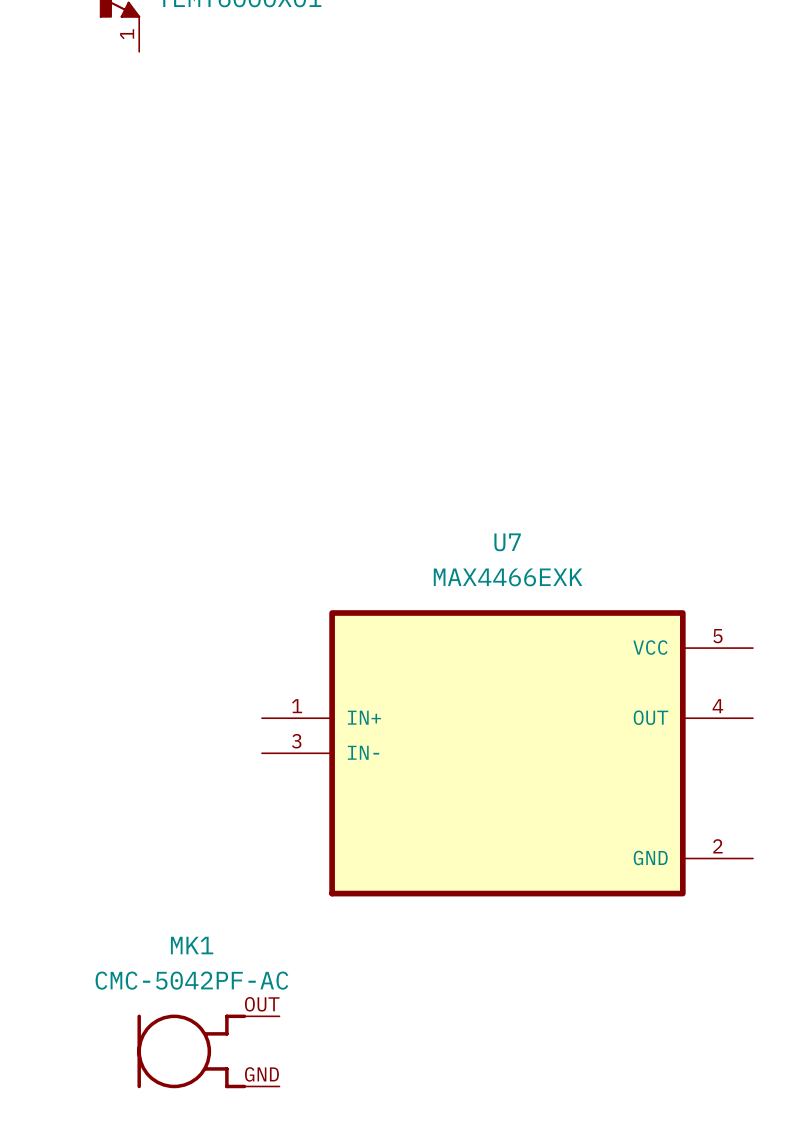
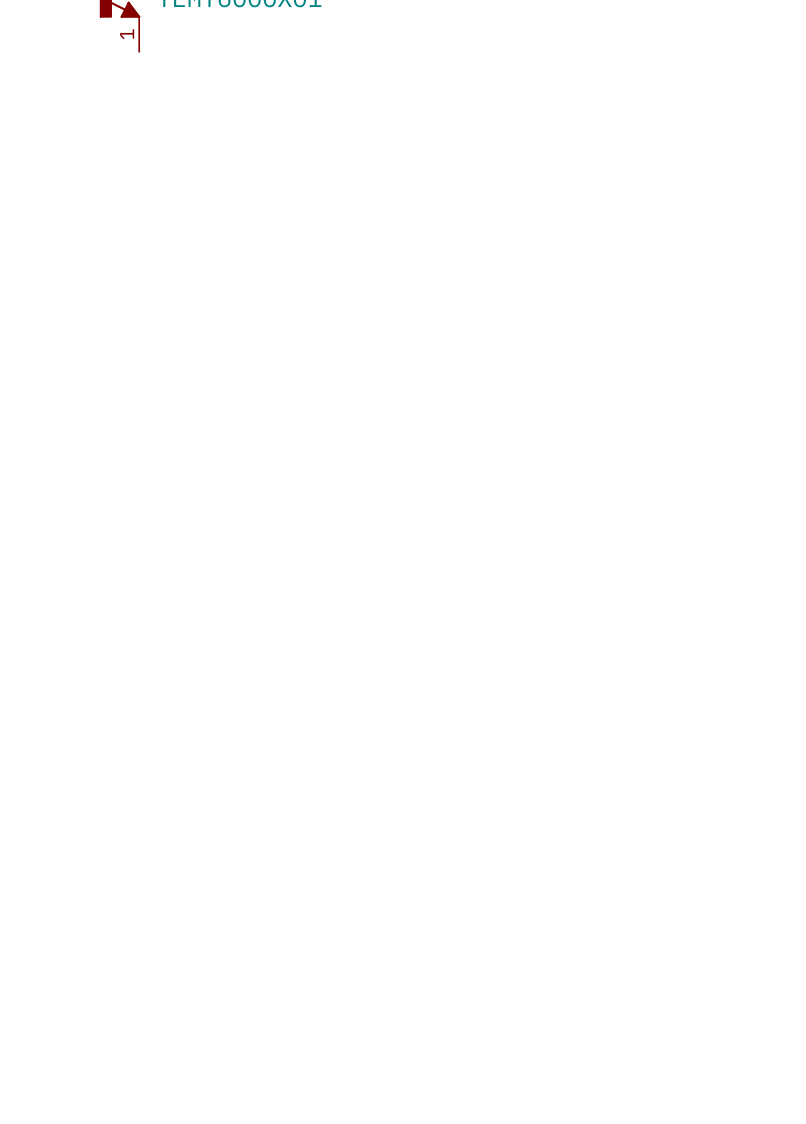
U7: MAX4466EXK (507, 753) -> none
MK1: CMC-5042PF-AC (208, 1051) -> none

